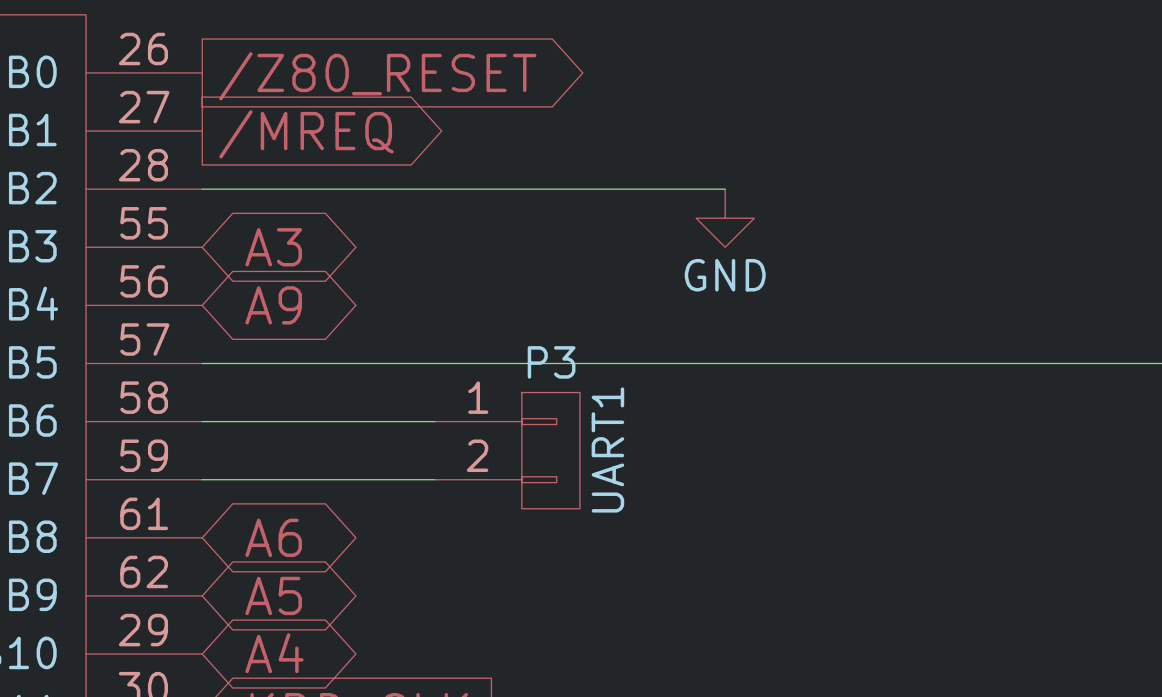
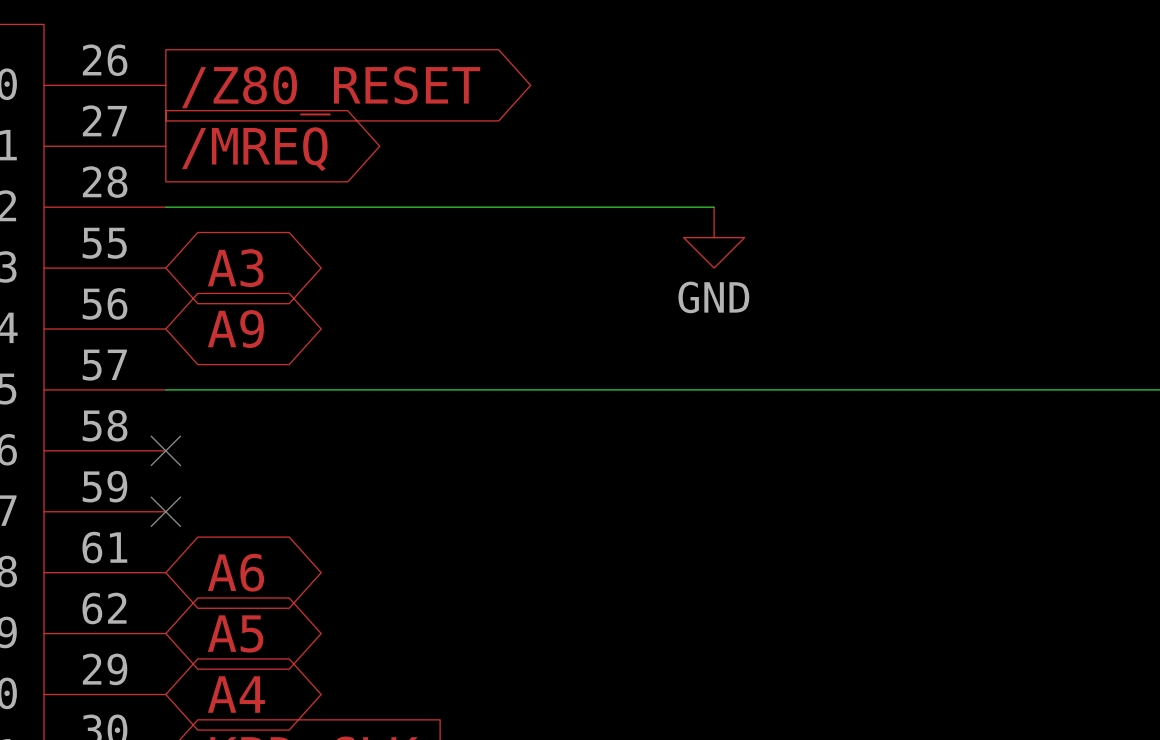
wire: (202, 421) (434, 421) -> none
no-connect mark: none -> (165, 450)
P3: UART1 (507, 450) -> none
wire: (202, 479) (434, 479) -> none
no-connect mark: none -> (165, 511)

